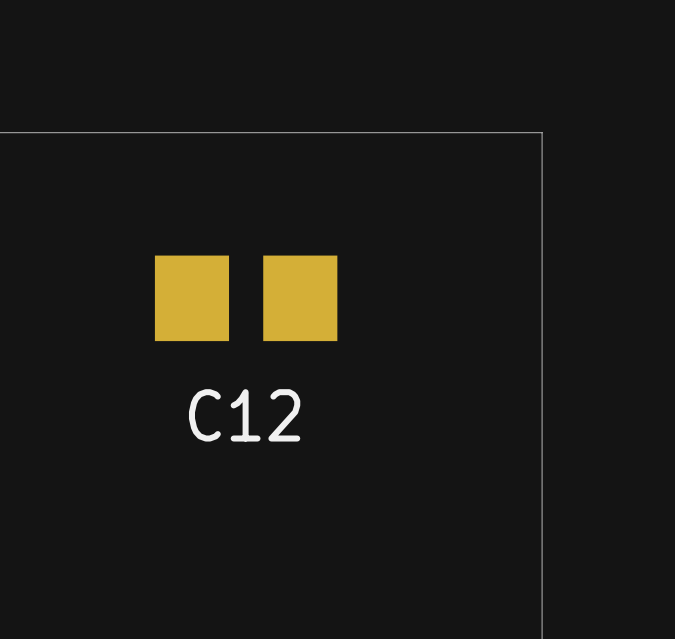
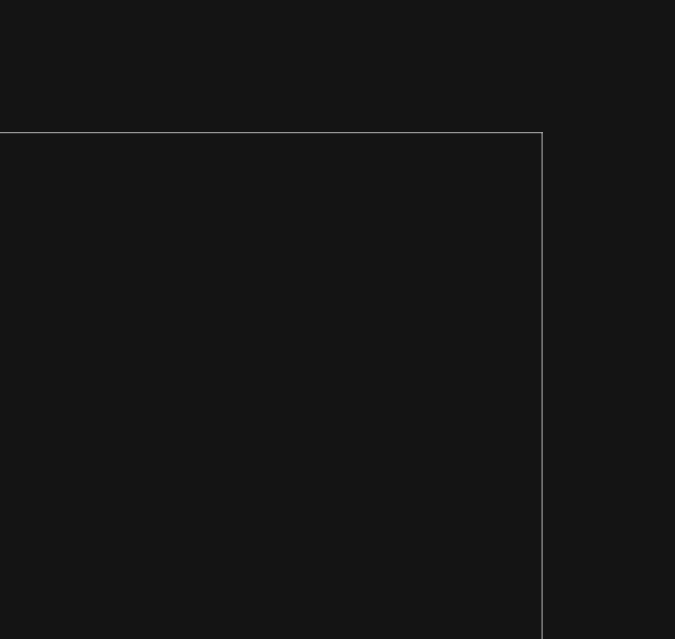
C12: (246, 298) -> none

